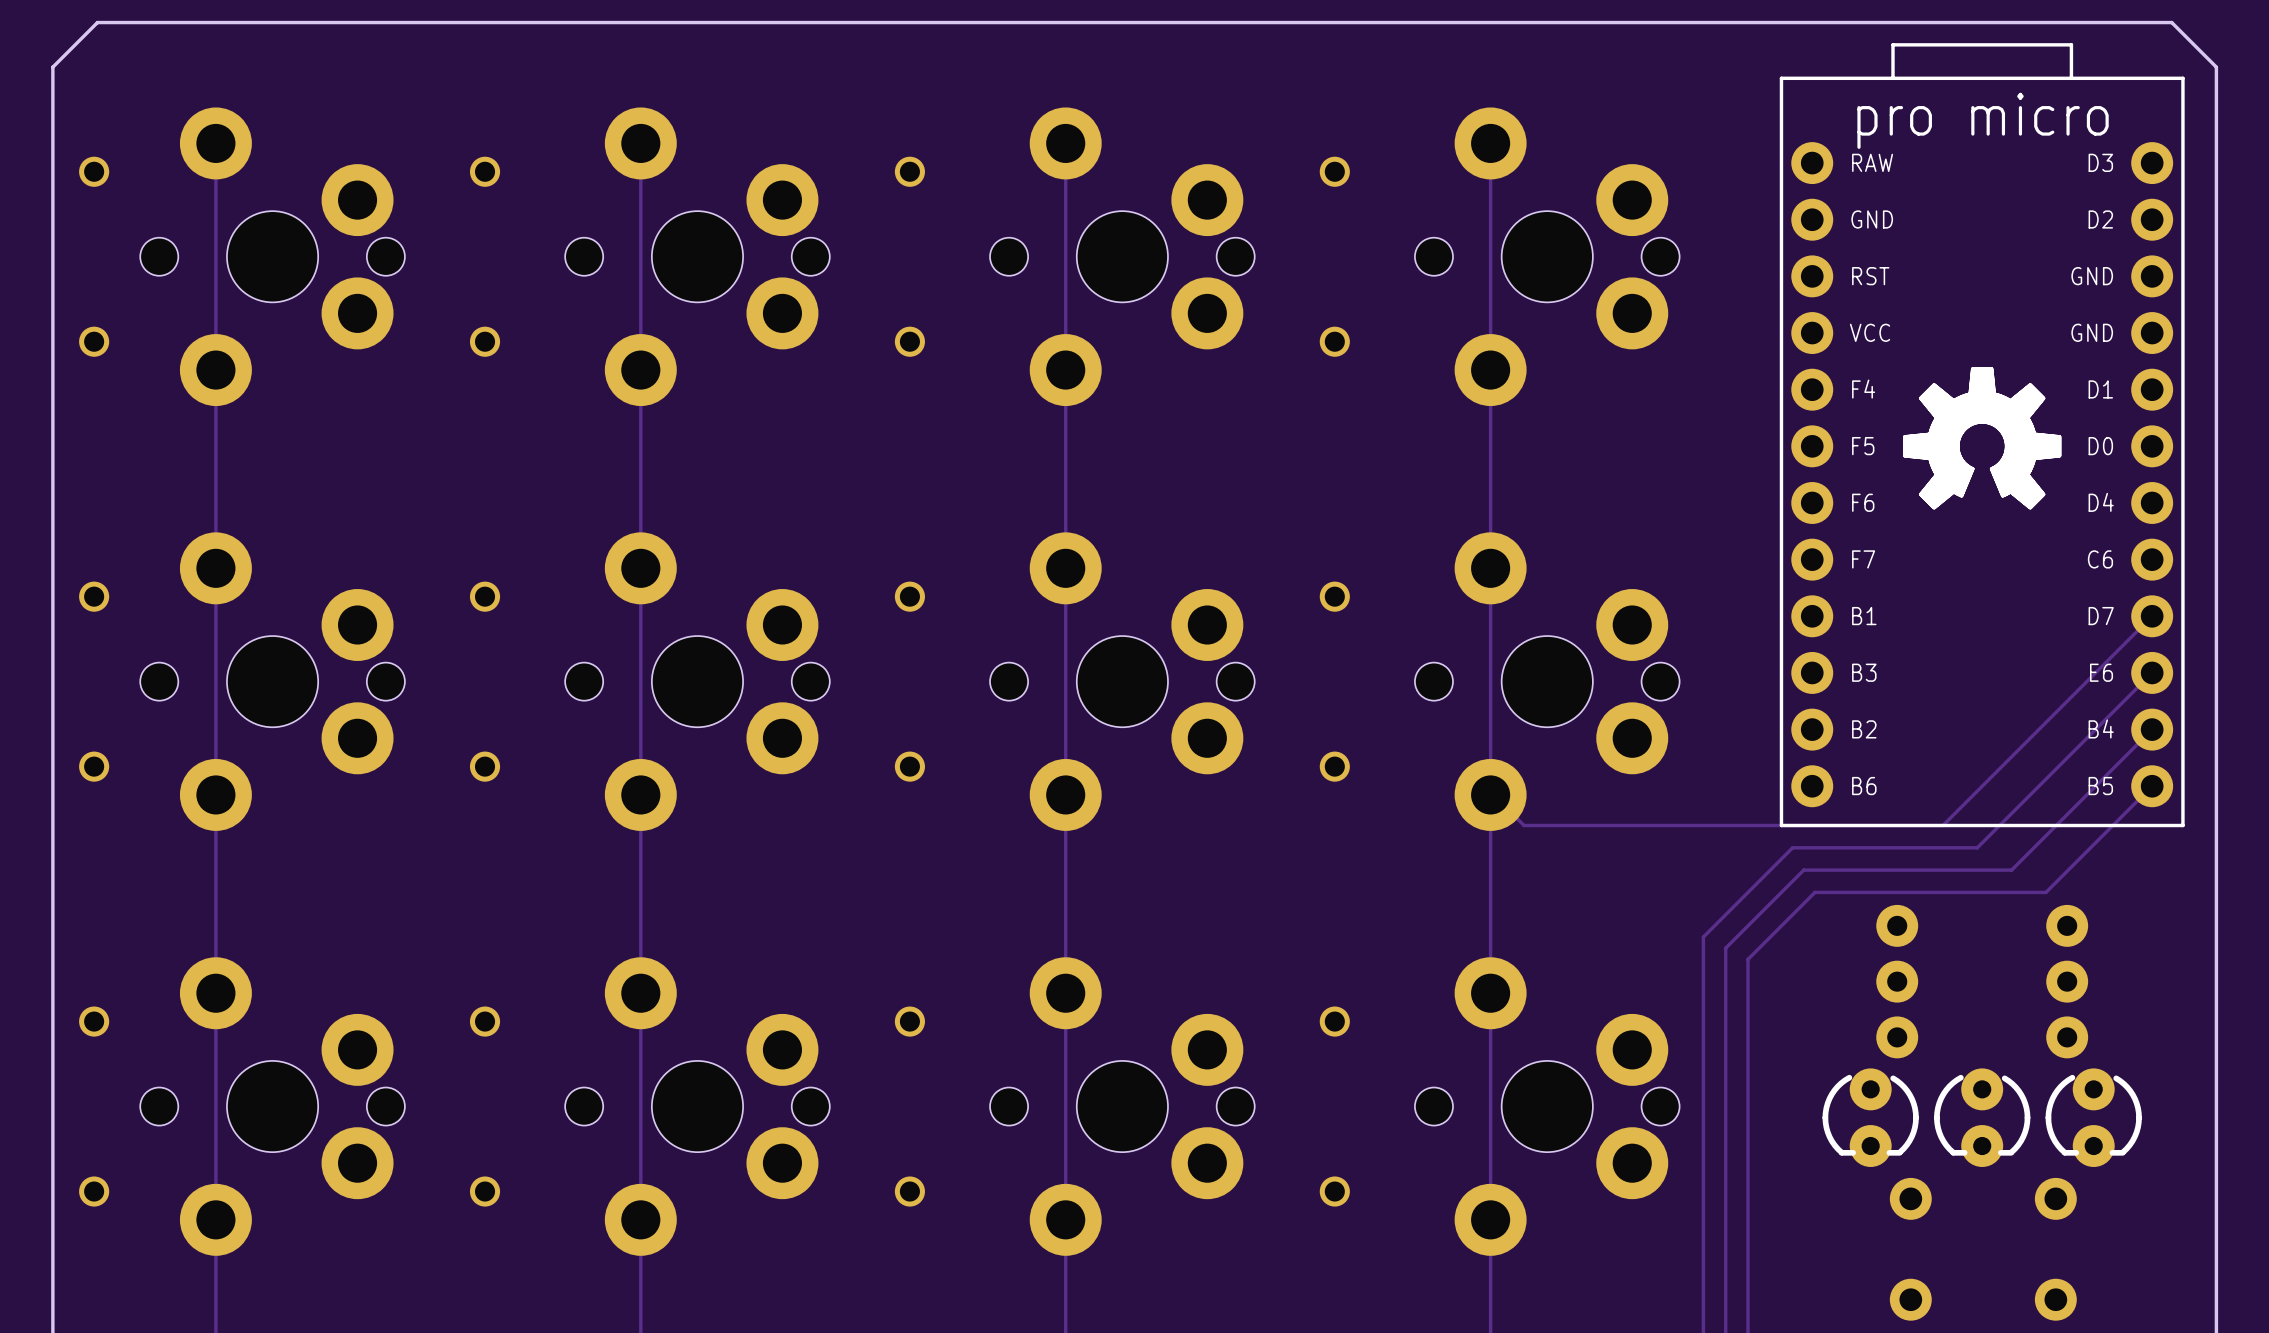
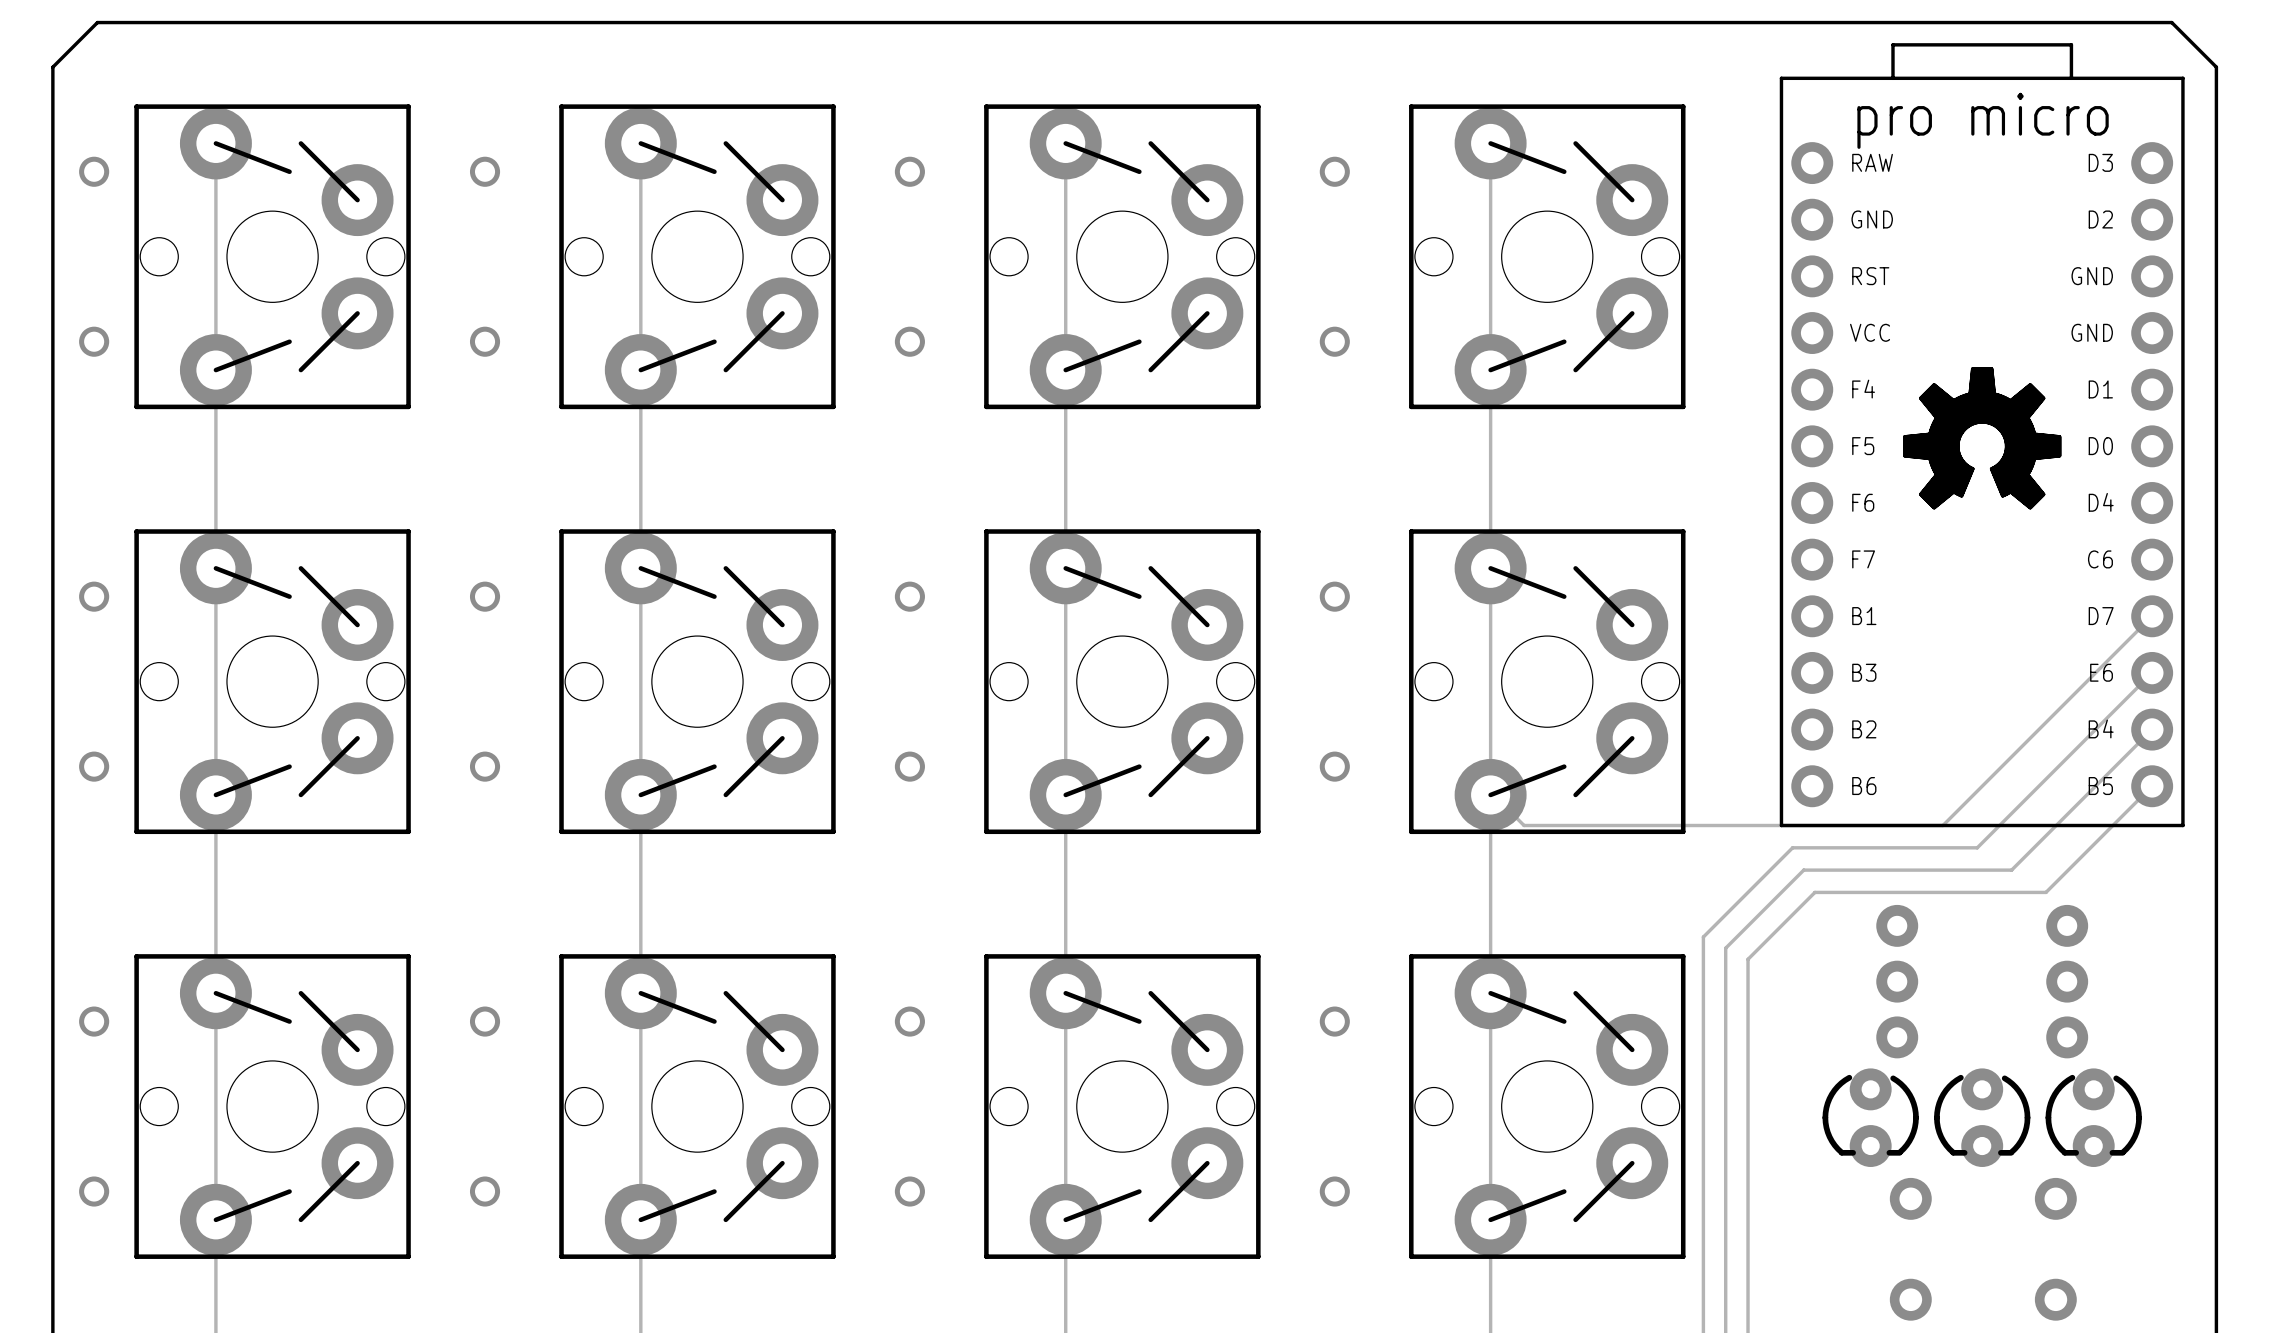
part footprint: [140, 107, 405, 407] -> [134, 104, 411, 410]
part footprint: [565, 107, 830, 407] -> [559, 104, 836, 410]
part footprint: [990, 107, 1255, 407] -> [984, 104, 1261, 410]
part footprint: [1414, 107, 1680, 407] -> [1409, 104, 1686, 410]
part footprint: [140, 532, 405, 831] -> [134, 529, 411, 835]
part footprint: [565, 532, 830, 831] -> [559, 529, 836, 835]
part footprint: [990, 532, 1255, 831] -> [984, 529, 1261, 835]
part footprint: [1414, 532, 1680, 831] -> [1409, 529, 1686, 835]
part footprint: [140, 957, 405, 1256] -> [134, 954, 411, 1259]
part footprint: [565, 957, 830, 1256] -> [559, 954, 836, 1259]
part footprint: [990, 957, 1255, 1256] -> [984, 954, 1261, 1259]
part footprint: [1414, 957, 1680, 1256] -> [1409, 954, 1686, 1259]

